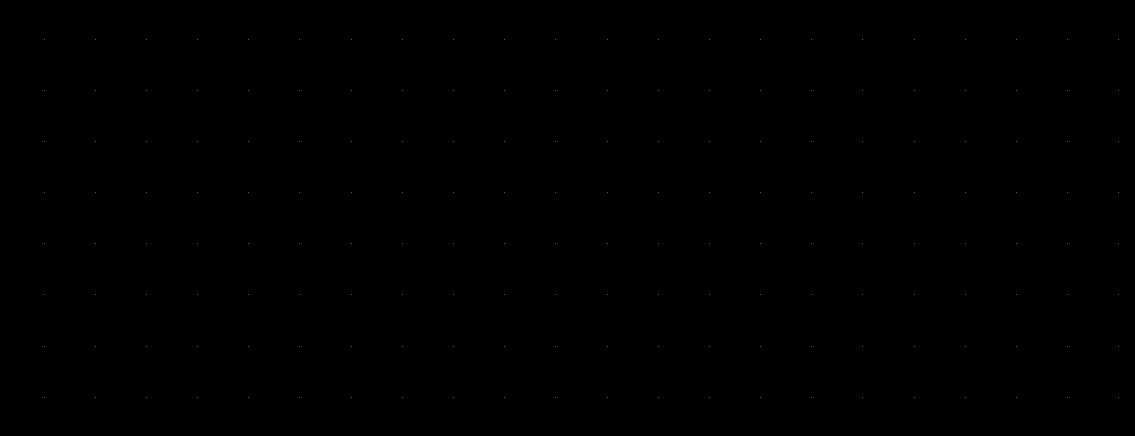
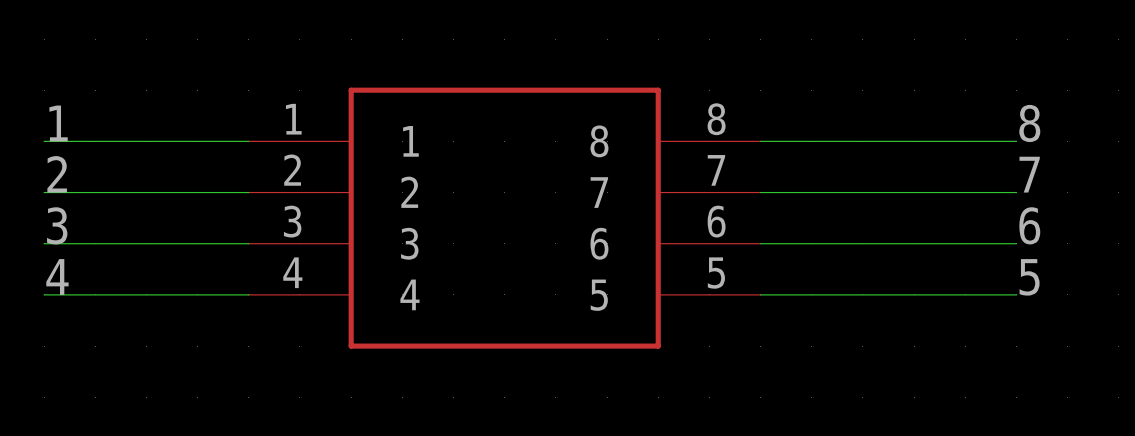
label: none -> 1 (58, 123)
label: none -> 8 (1029, 123)
wire: none -> (44, 141) (248, 141)
wire: none -> (760, 141) (1016, 141)
label: none -> 2 (57, 174)
label: none -> 7 (1029, 174)
wire: none -> (44, 192) (248, 192)
wire: none -> (760, 192) (1016, 192)
part: none -> (504, 218)
label: none -> 3 (57, 225)
label: none -> 6 (1029, 225)
wire: none -> (44, 243) (248, 243)
wire: none -> (760, 243) (1016, 243)
label: none -> 4 (57, 276)
label: none -> 5 (1029, 277)
wire: none -> (44, 294) (248, 294)
wire: none -> (760, 294) (1016, 294)

